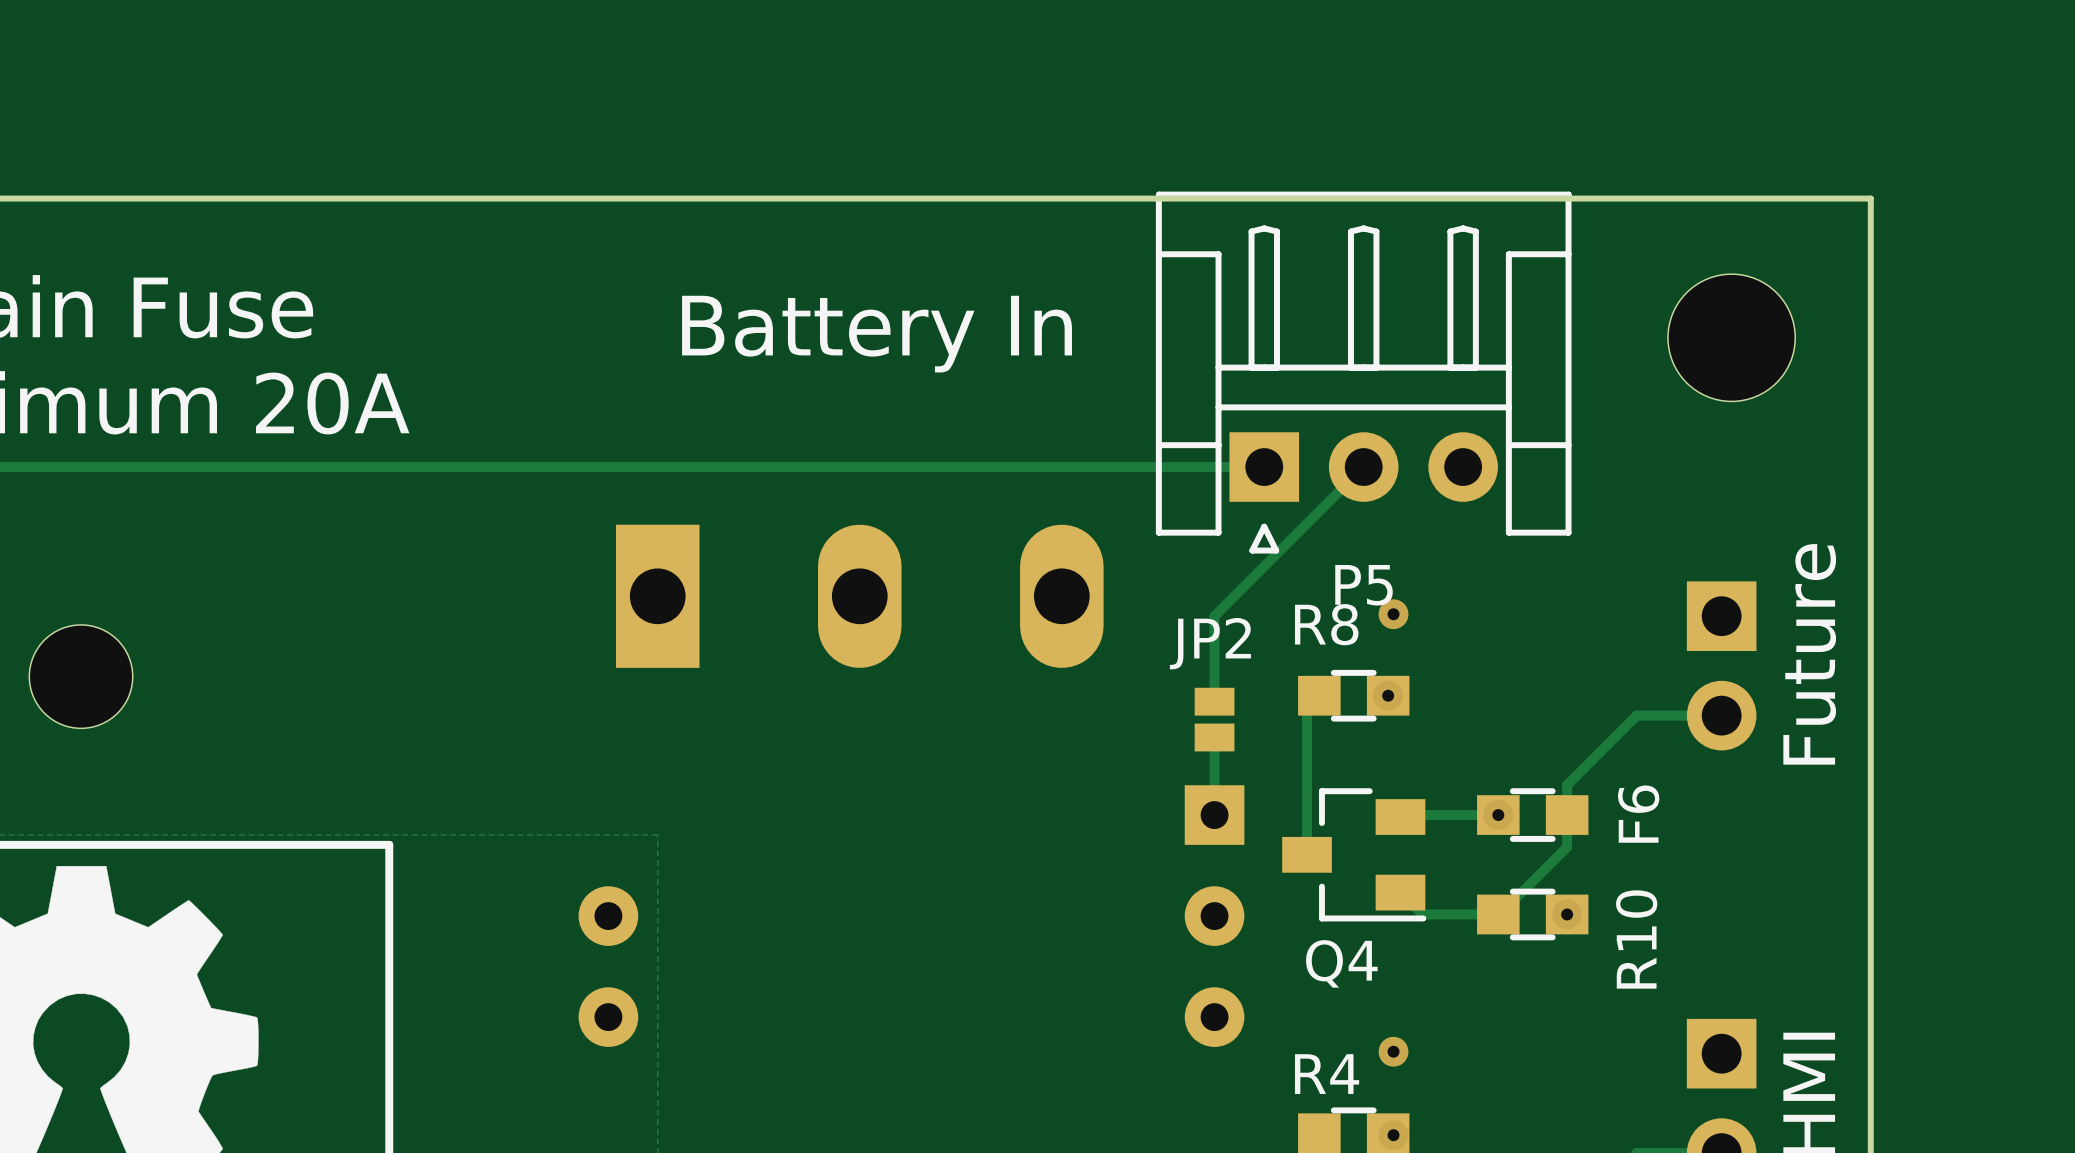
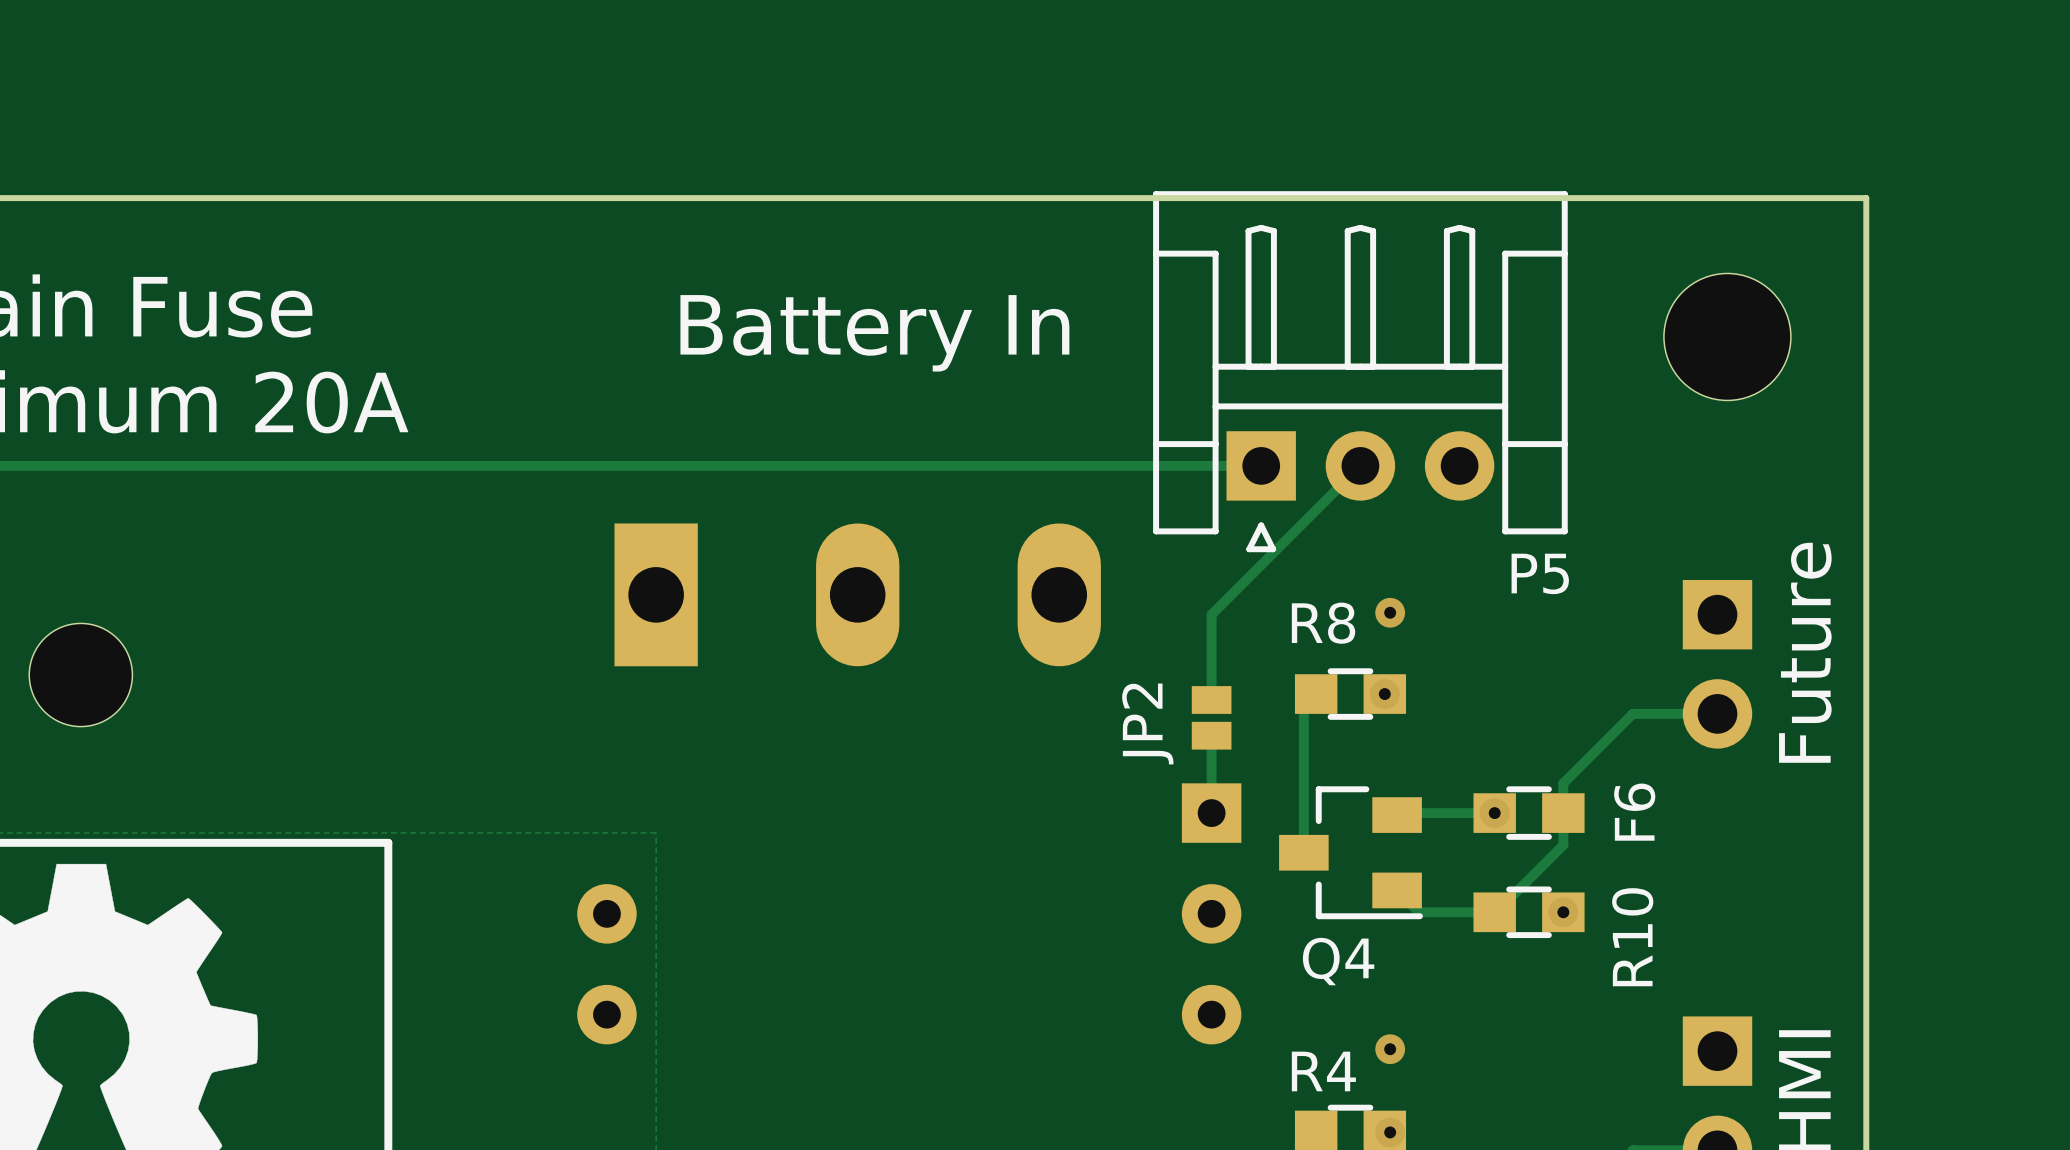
P5 name position: P5 (1364, 585) -> P5 (1540, 573)
JP2 name rotation: 0° (1210, 643) -> 90° counterclockwise (1147, 723)

